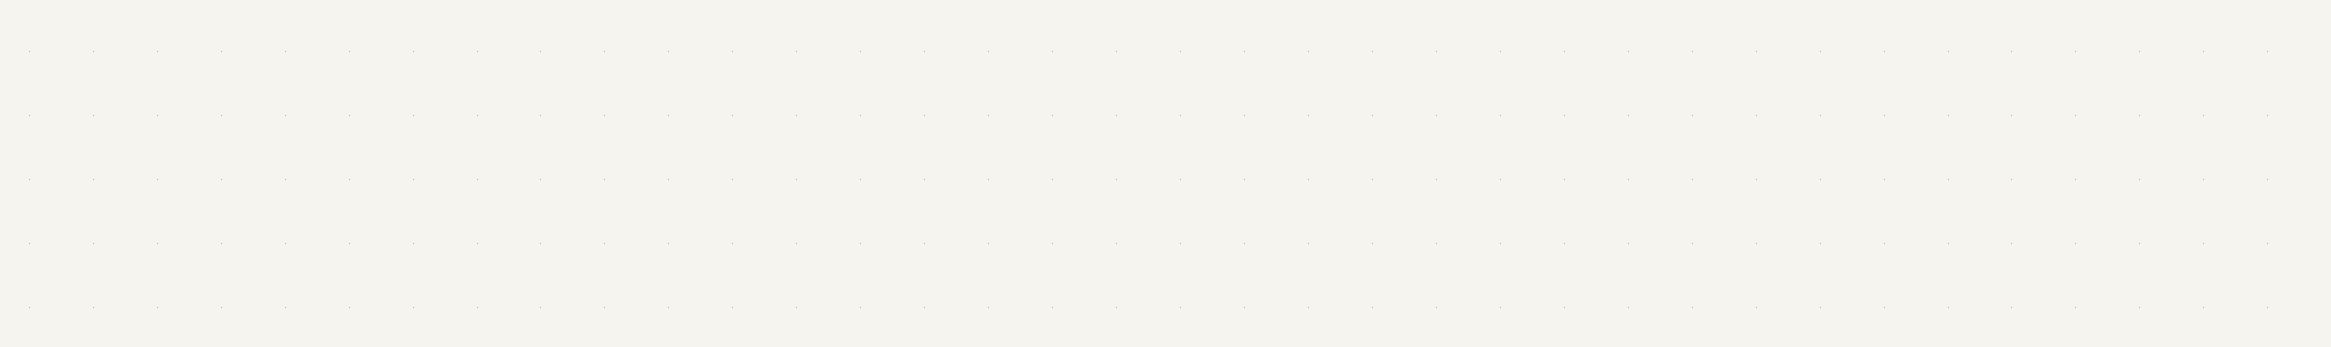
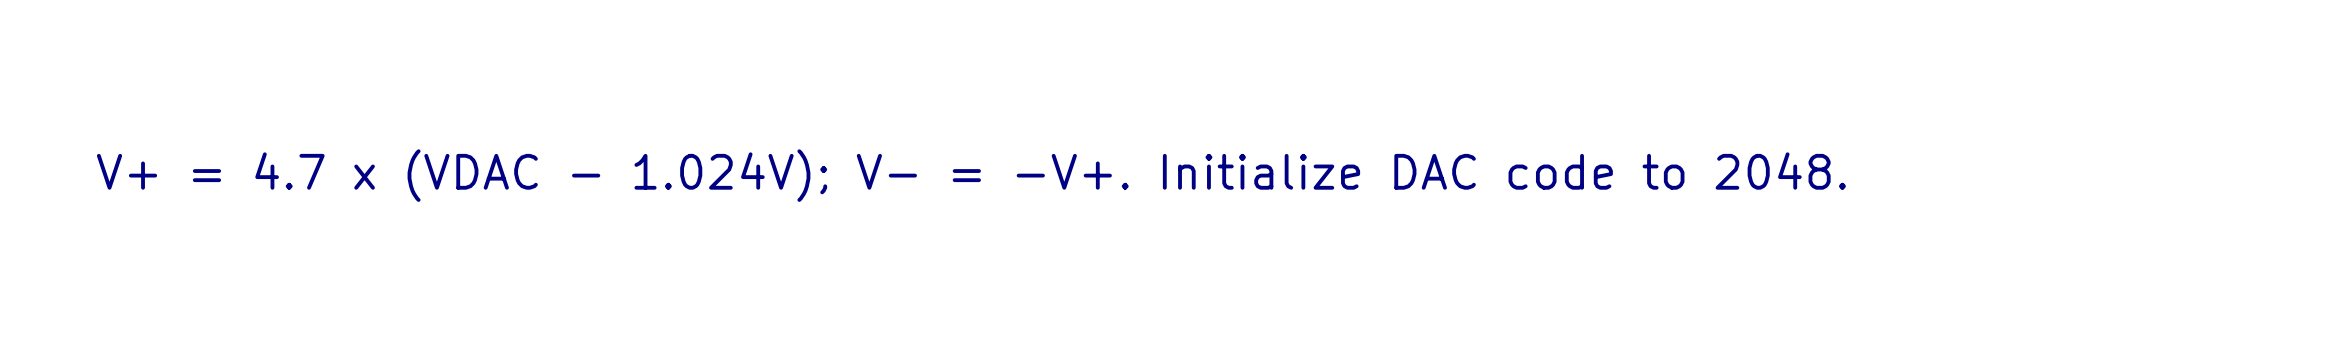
text: none -> V+ = 4.7 x (VDAC - 1.024V); V- = -V+. Initialize DAC code to 2048. (971, 175)

